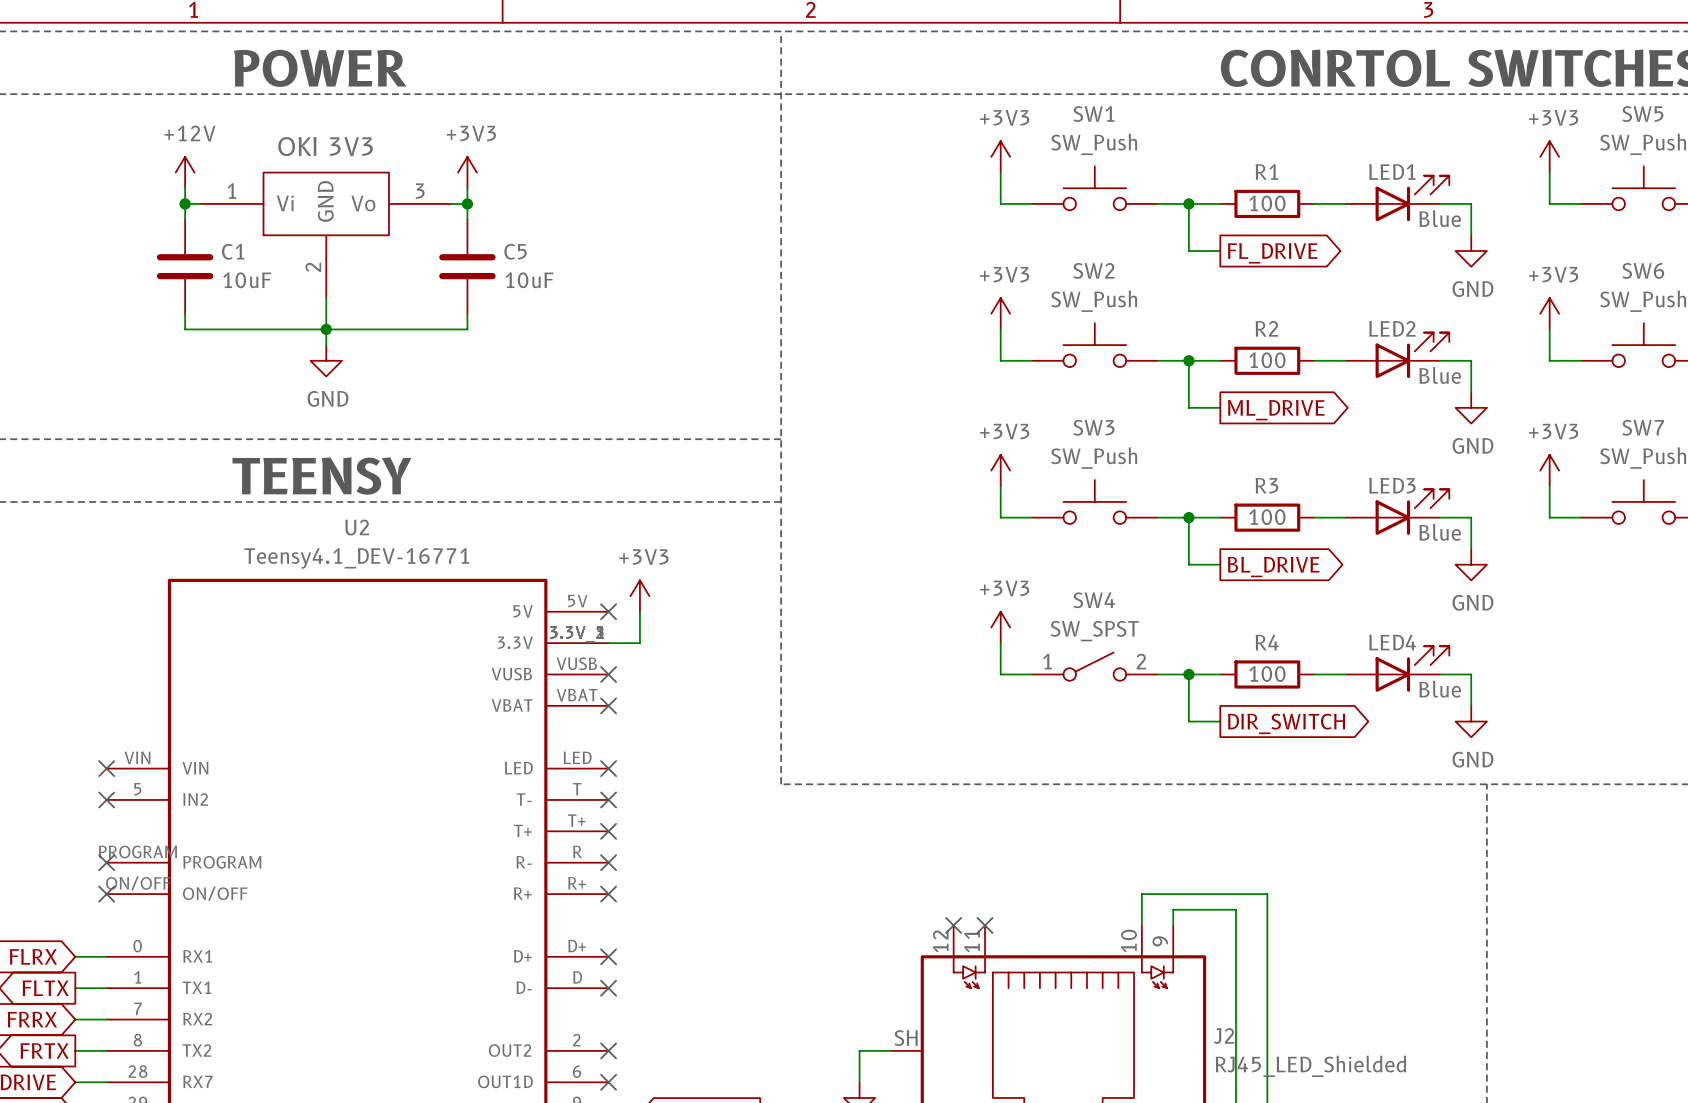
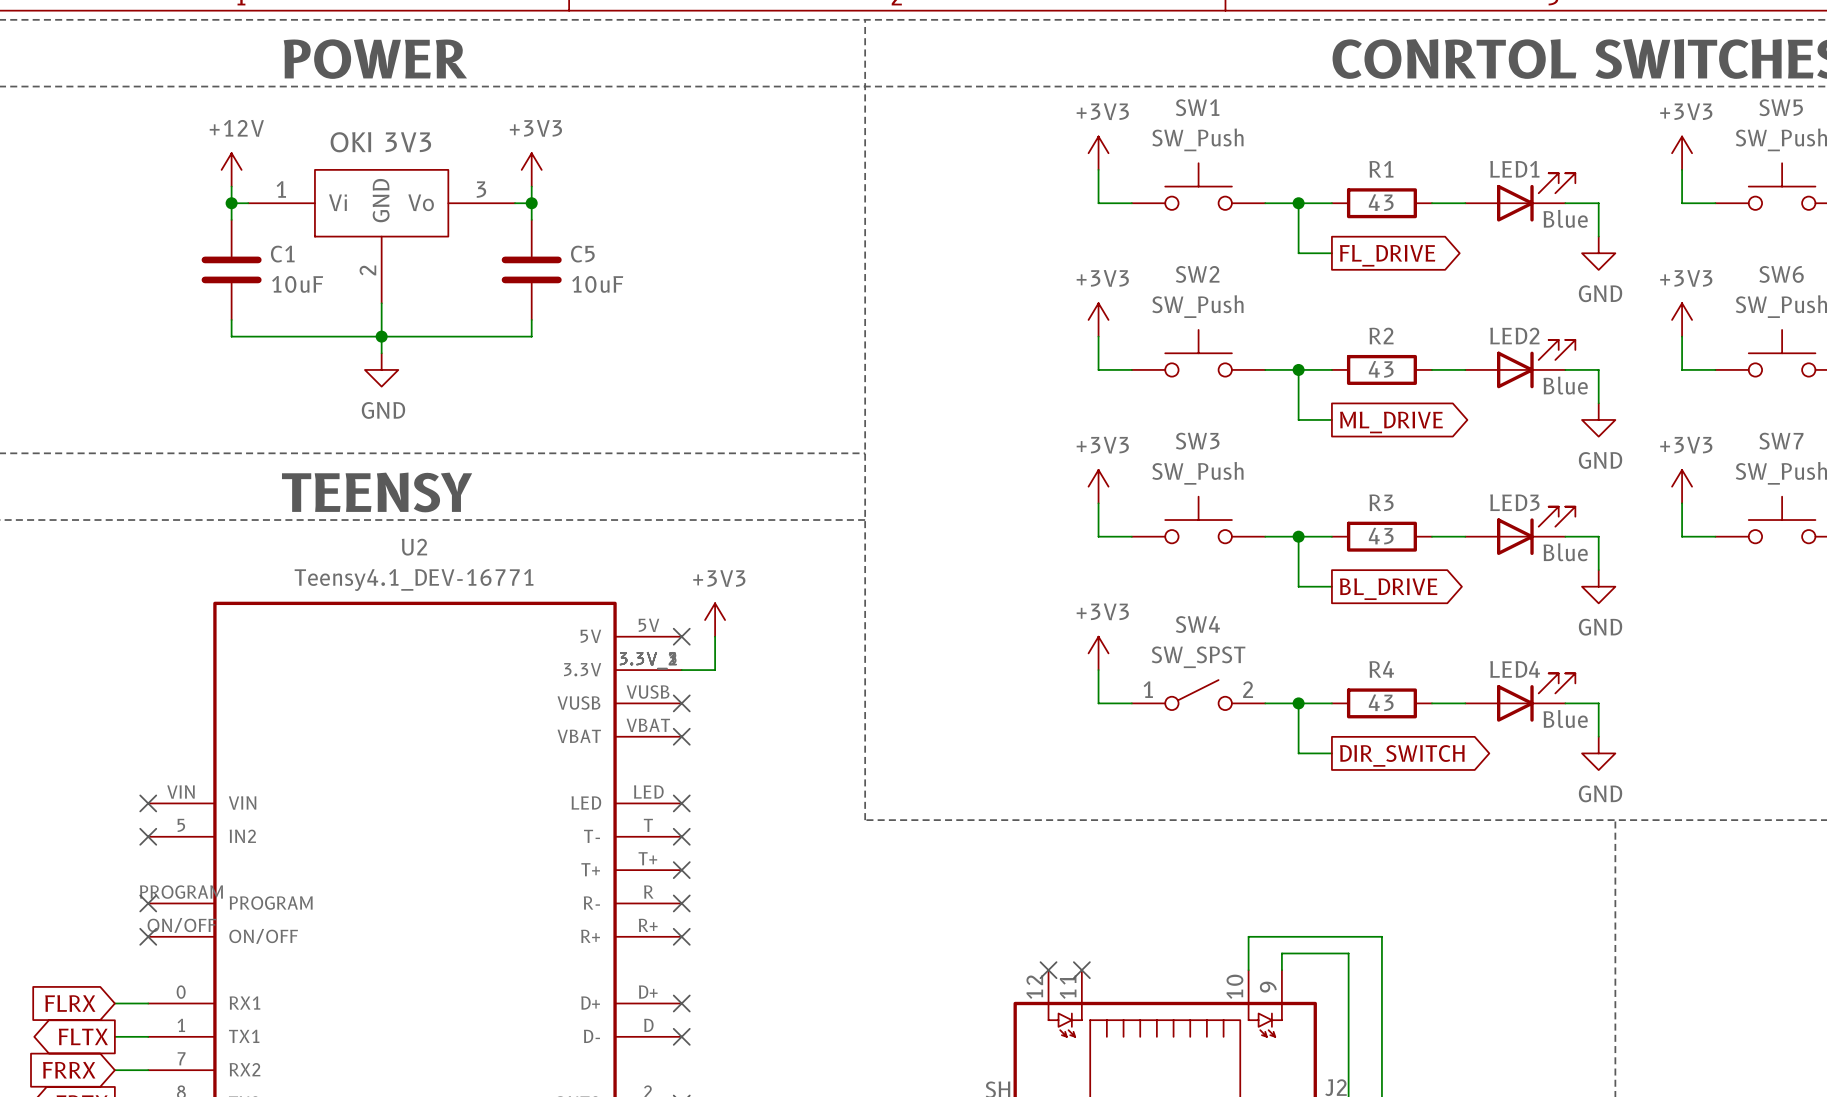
R1 value: 100 (1267, 203) -> 43 (1381, 202)
R2 value: 100 (1267, 360) -> 43 (1381, 369)
R3 value: 100 (1267, 517) -> 43 (1381, 536)
R4 value: 100 (1267, 673) -> 43 (1381, 702)

